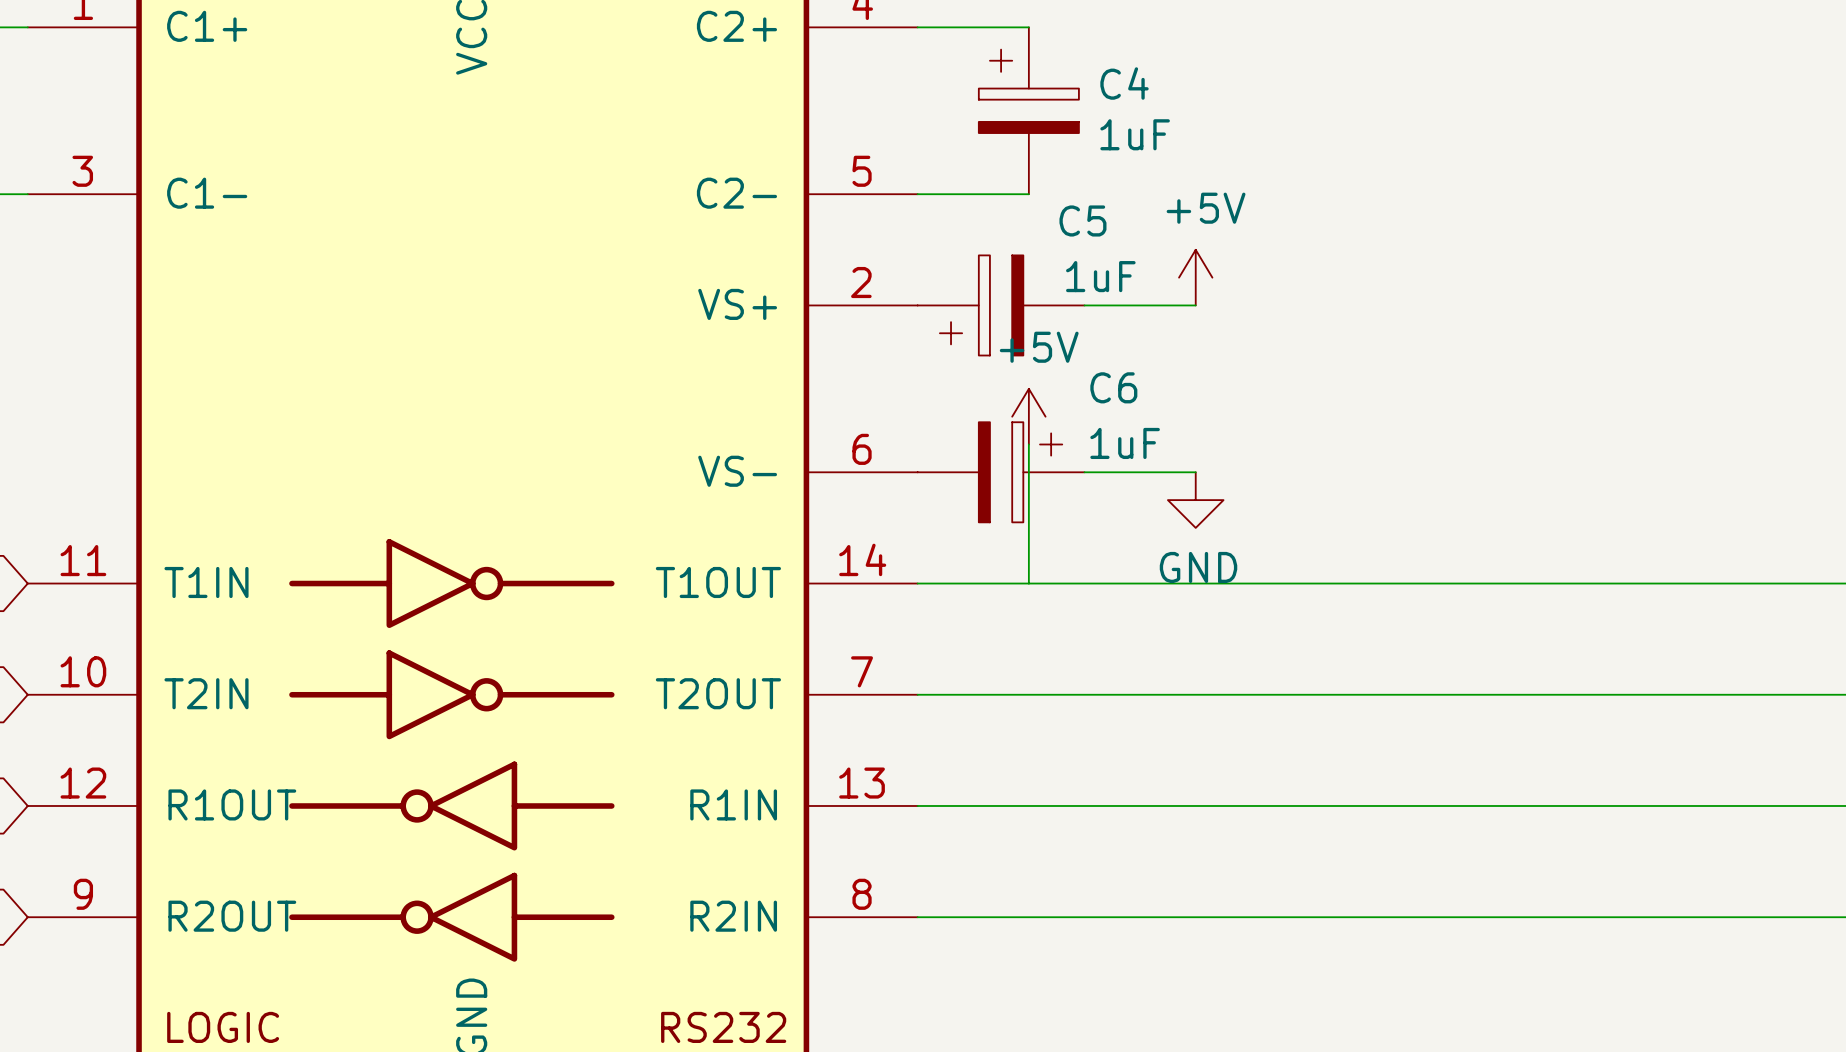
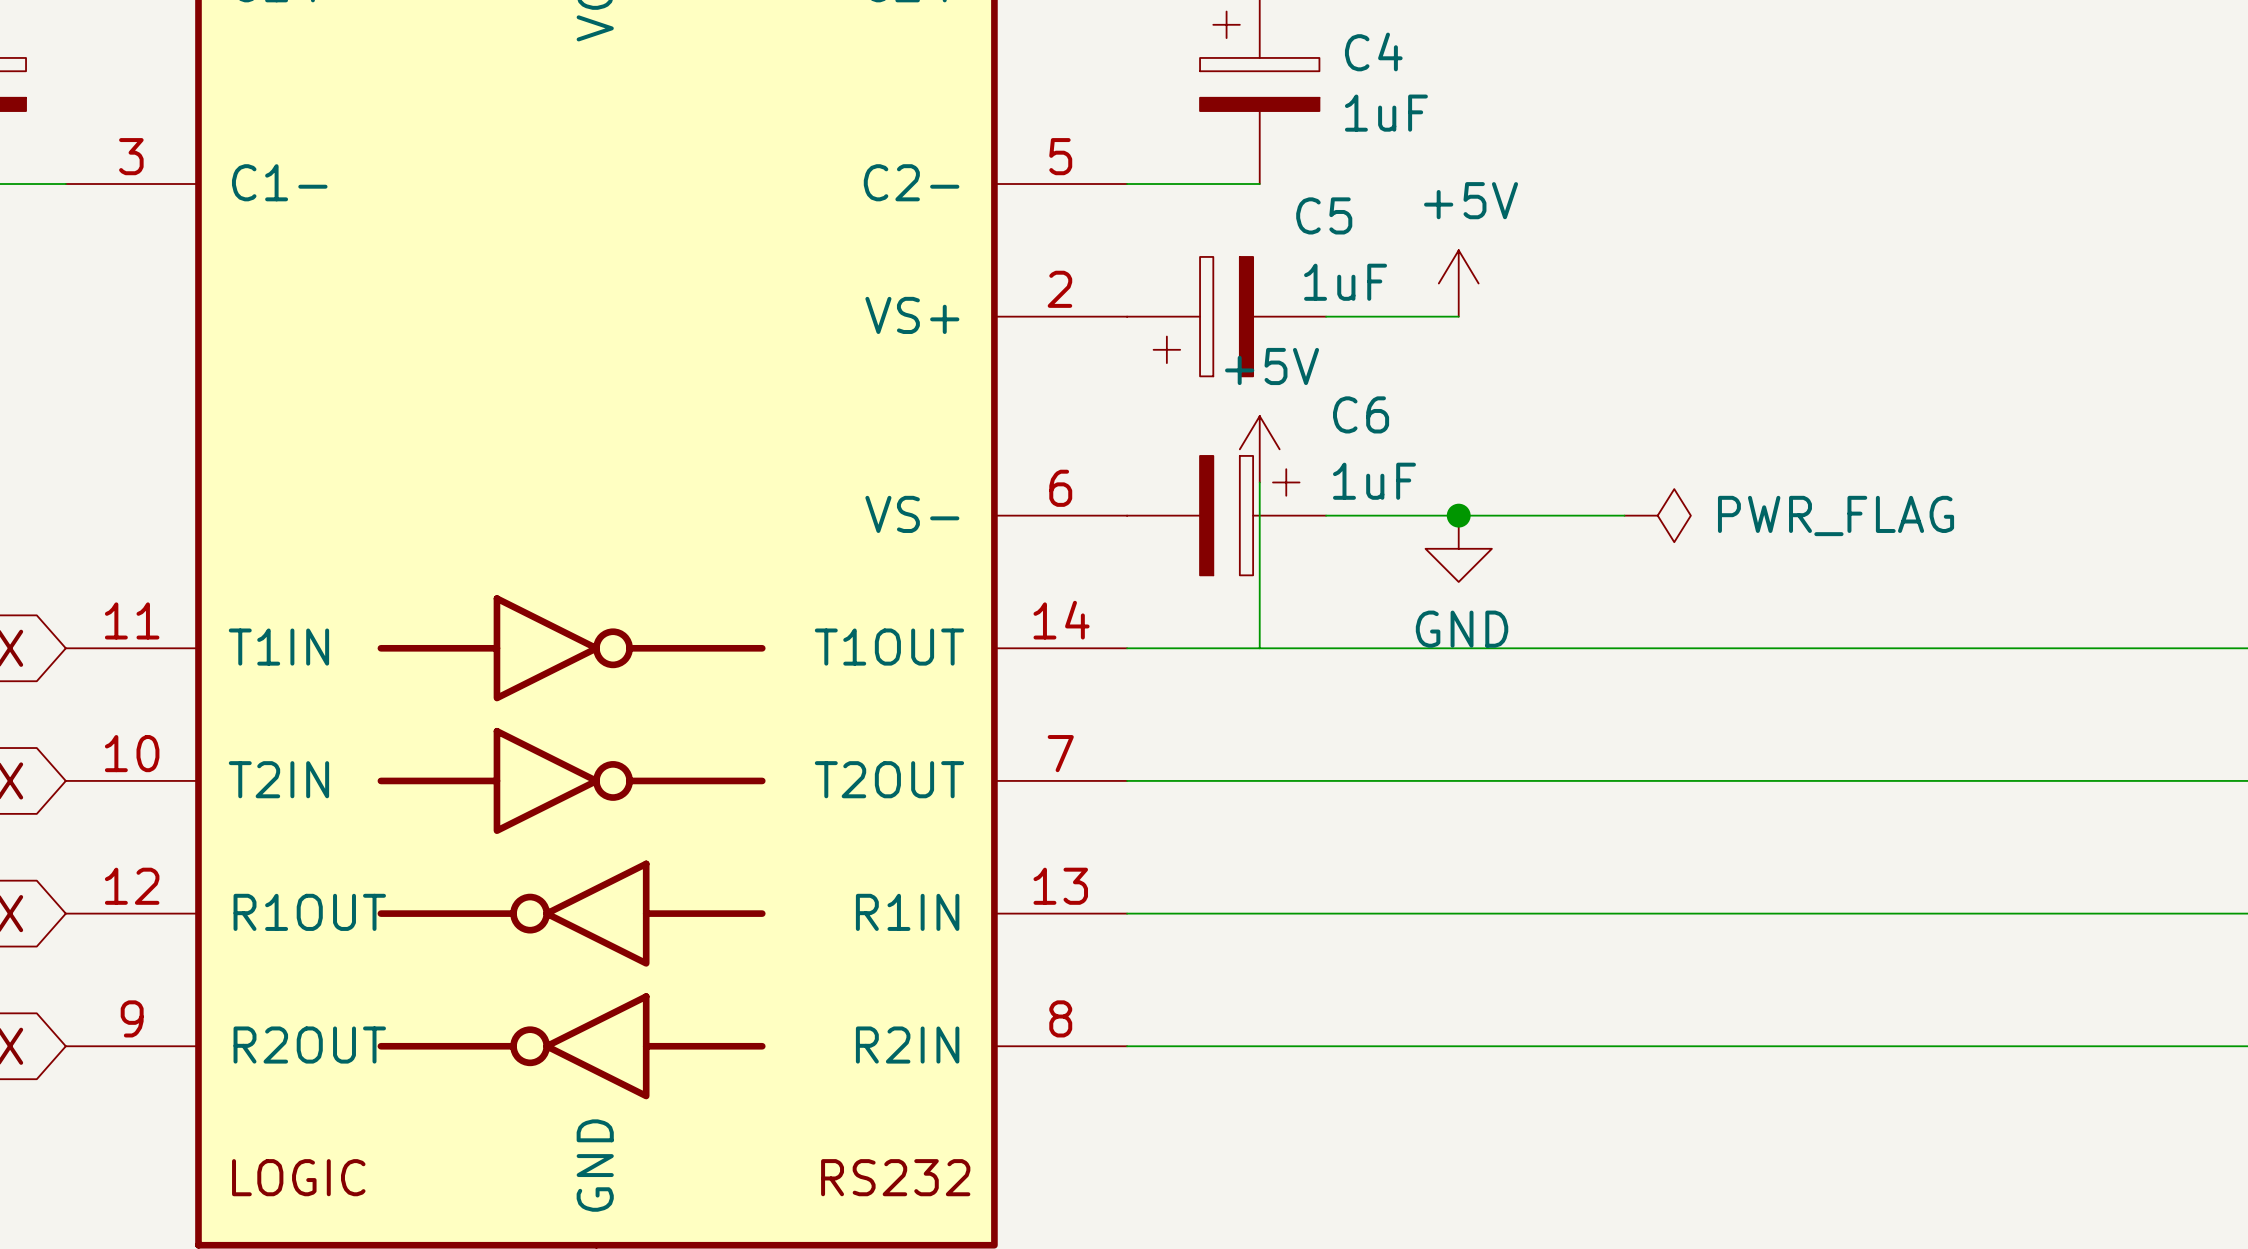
wire: none -> (1458, 515) (1624, 515)
junction: none -> (1458, 515)
power symbol: none -> PWR_FLAG (1657, 515)

